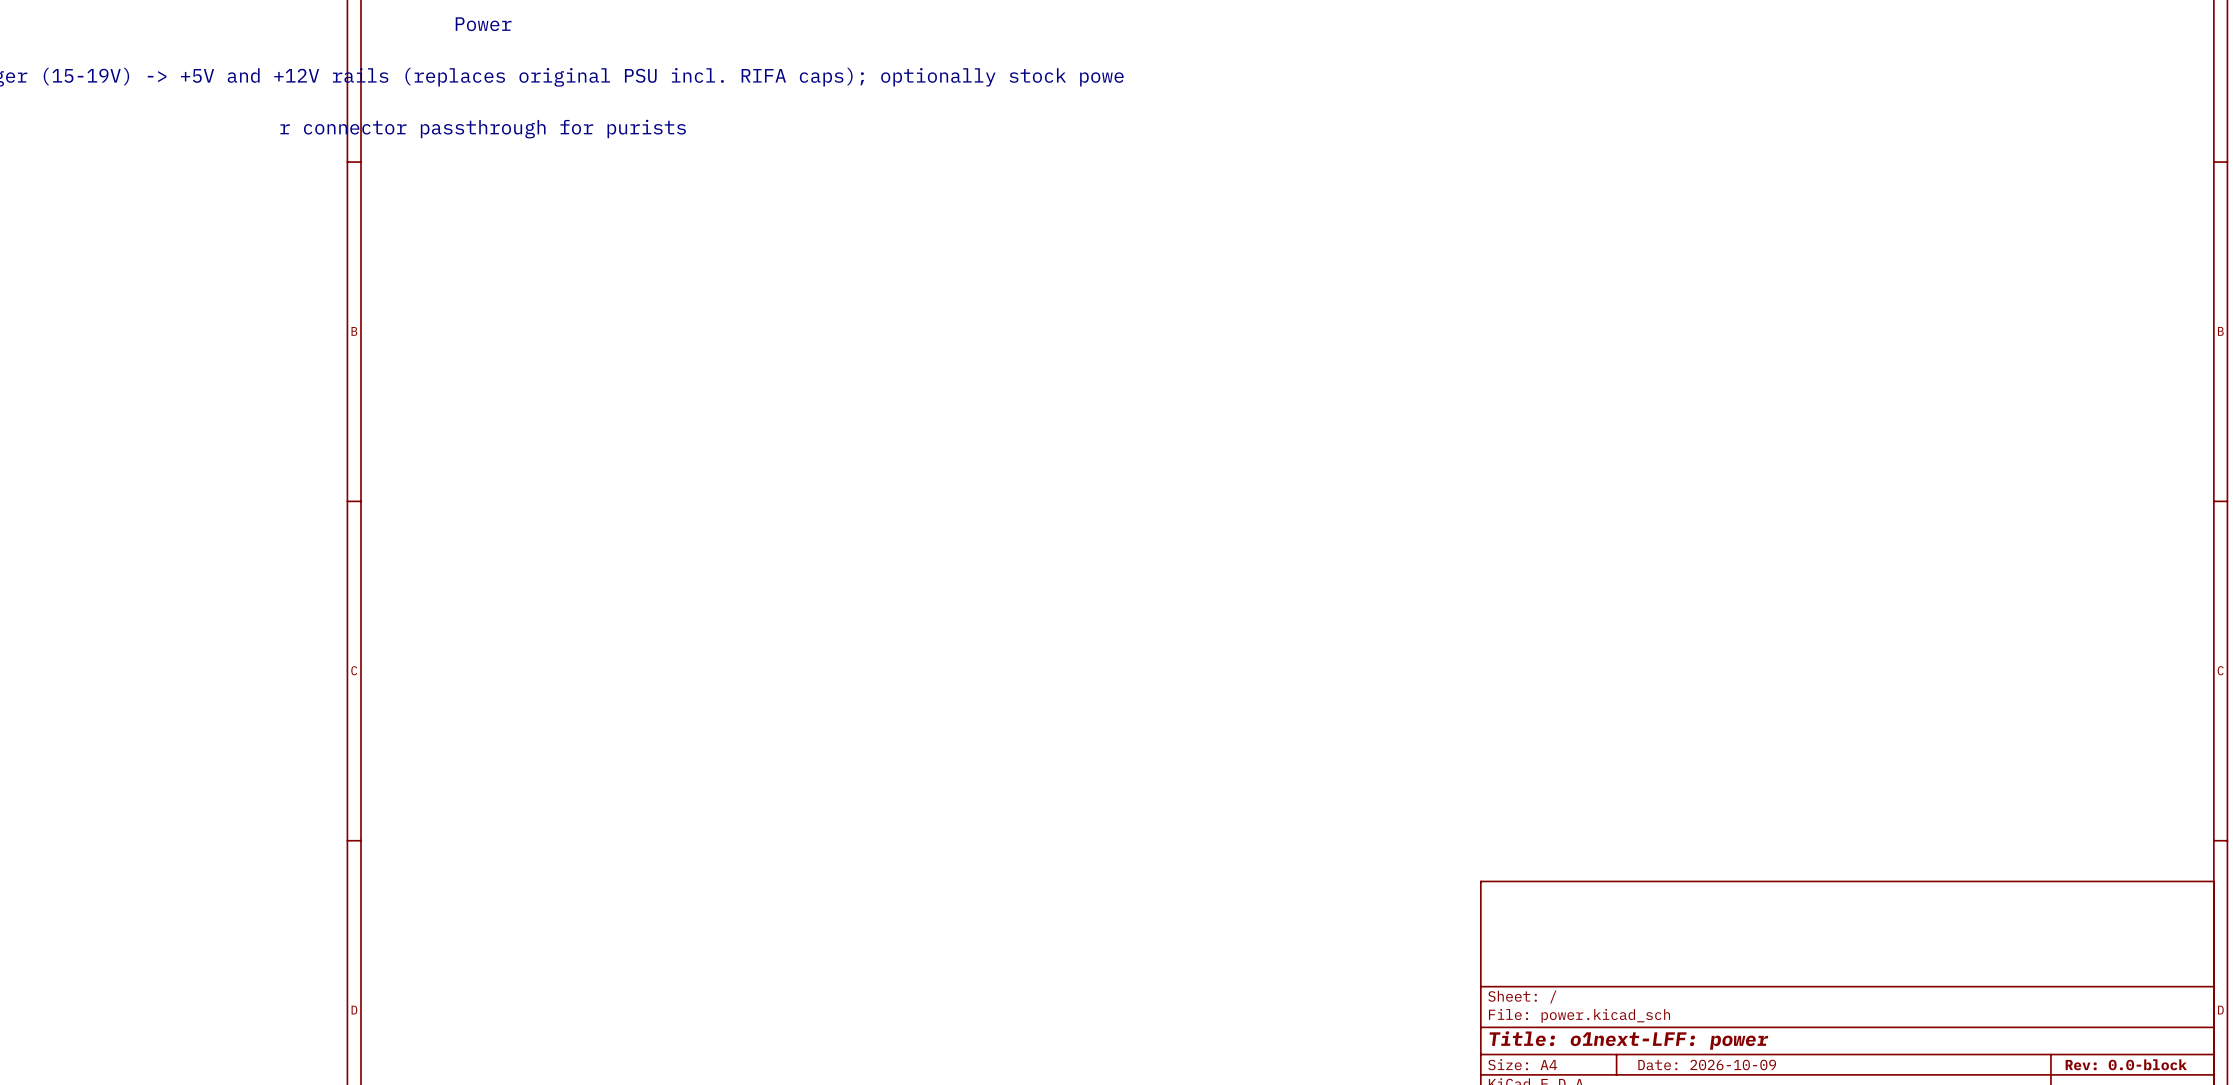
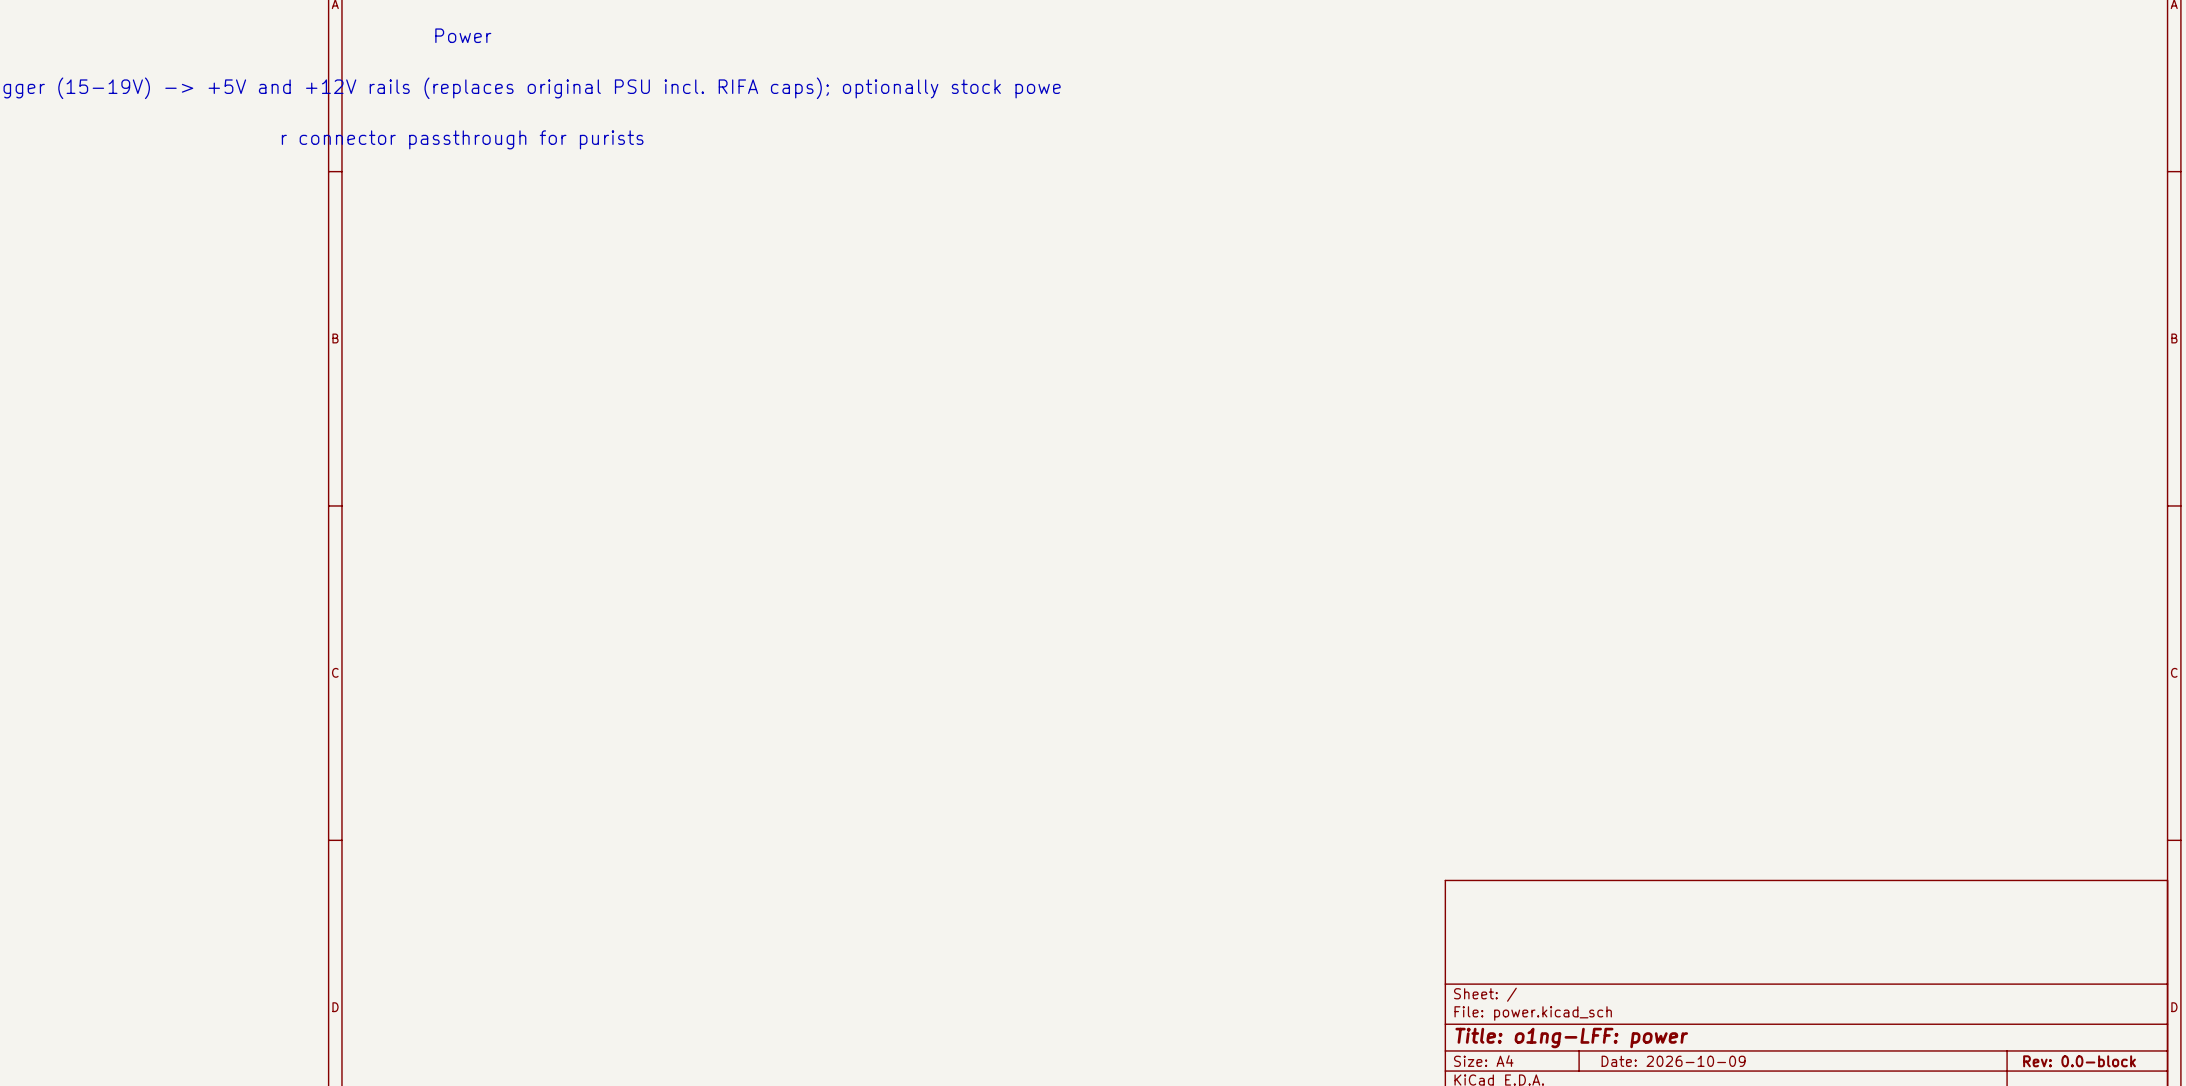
title block: Title: o1next-LFF: power (1628, 1040) -> Title: o1ng-LFF: power (1571, 1038)

